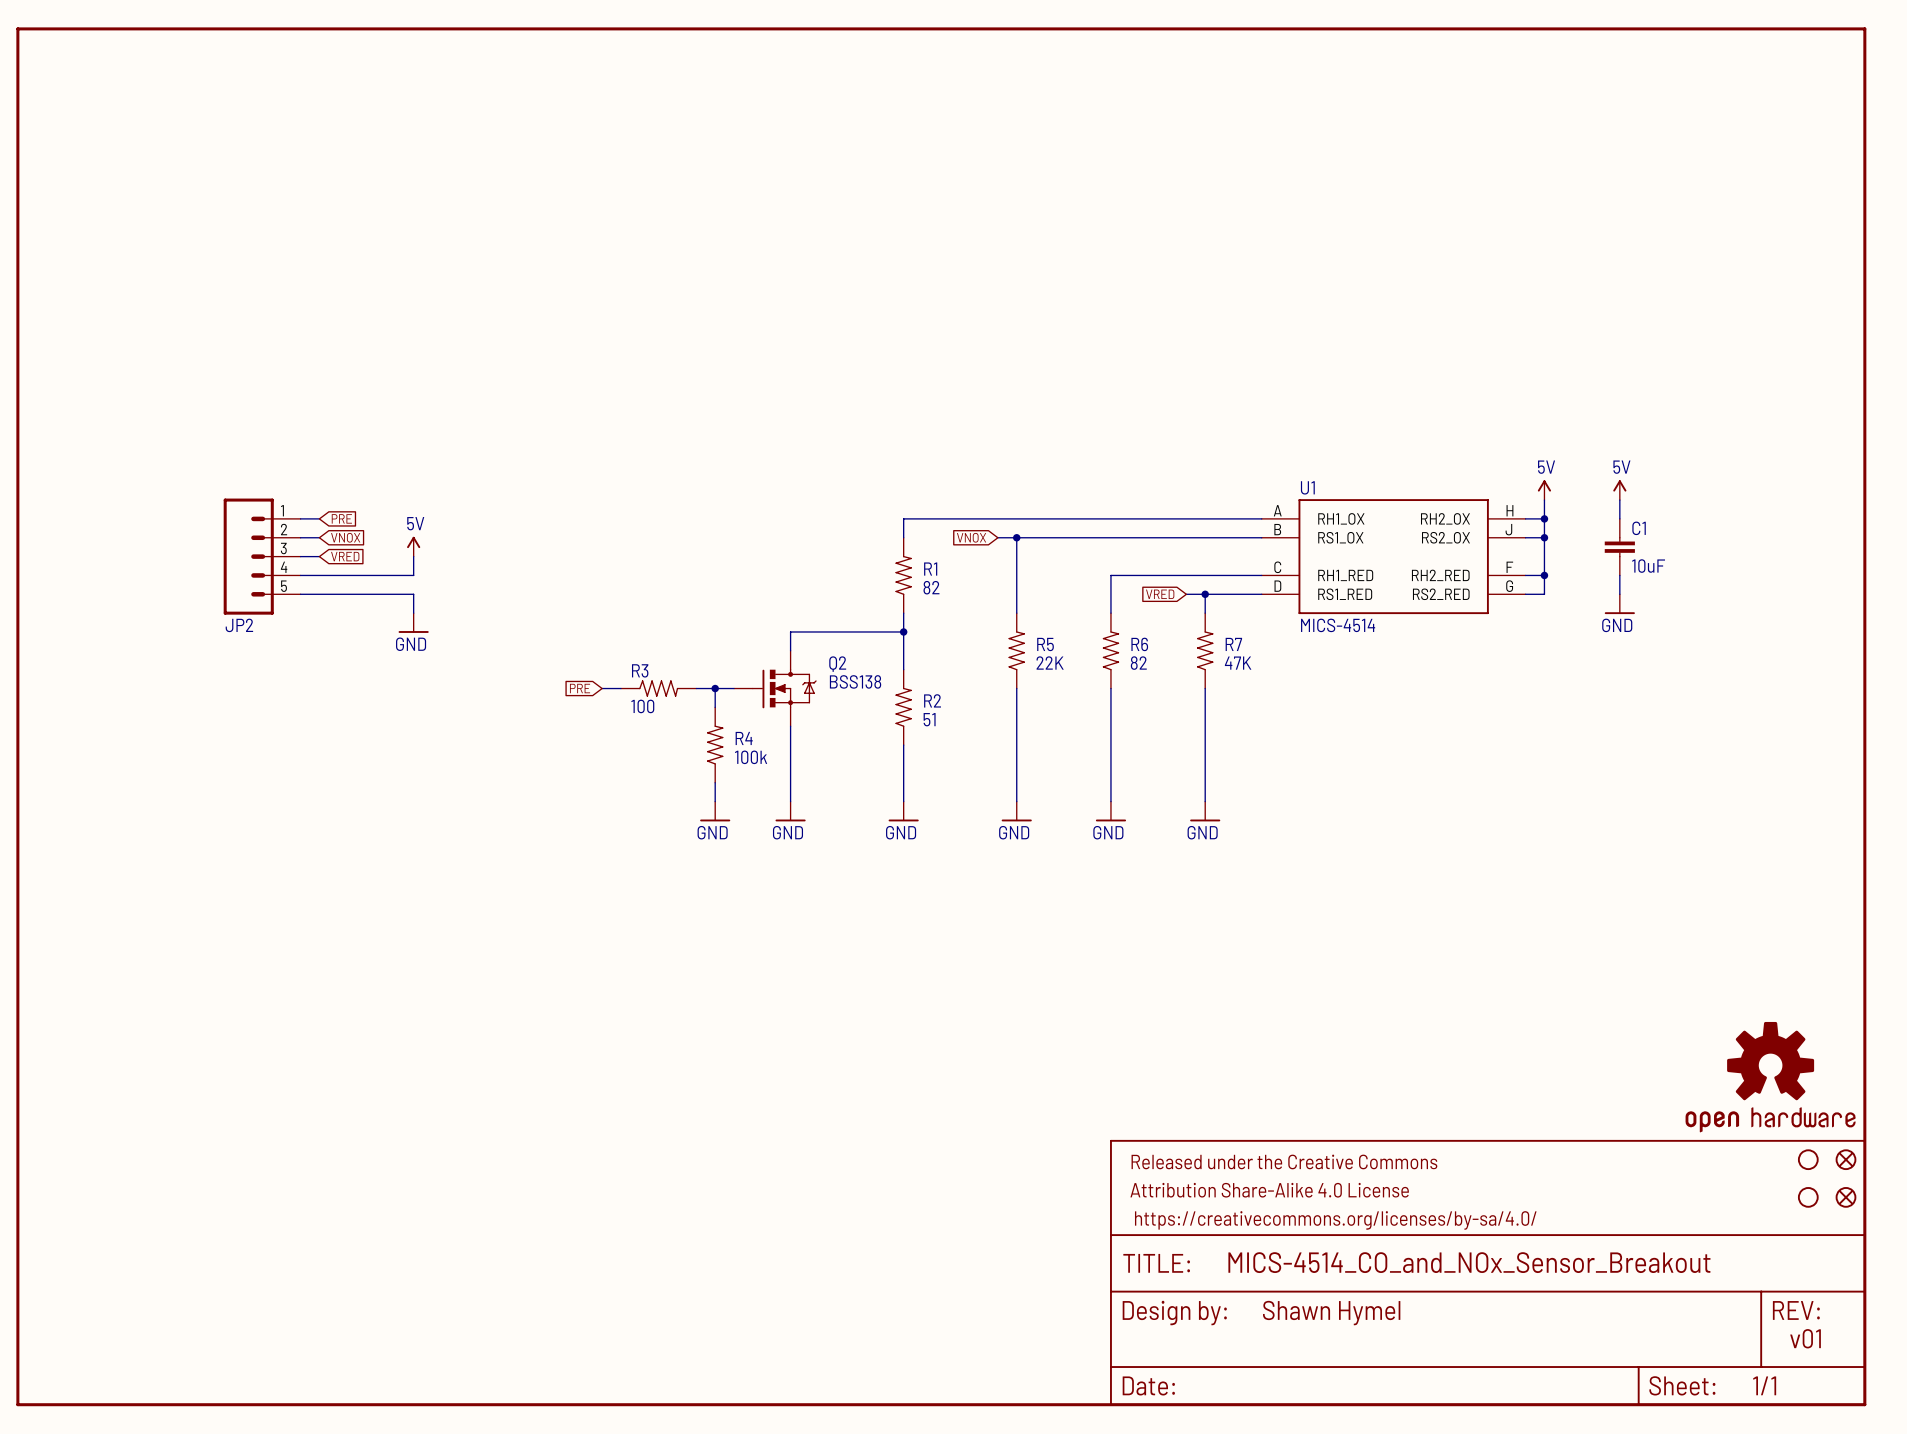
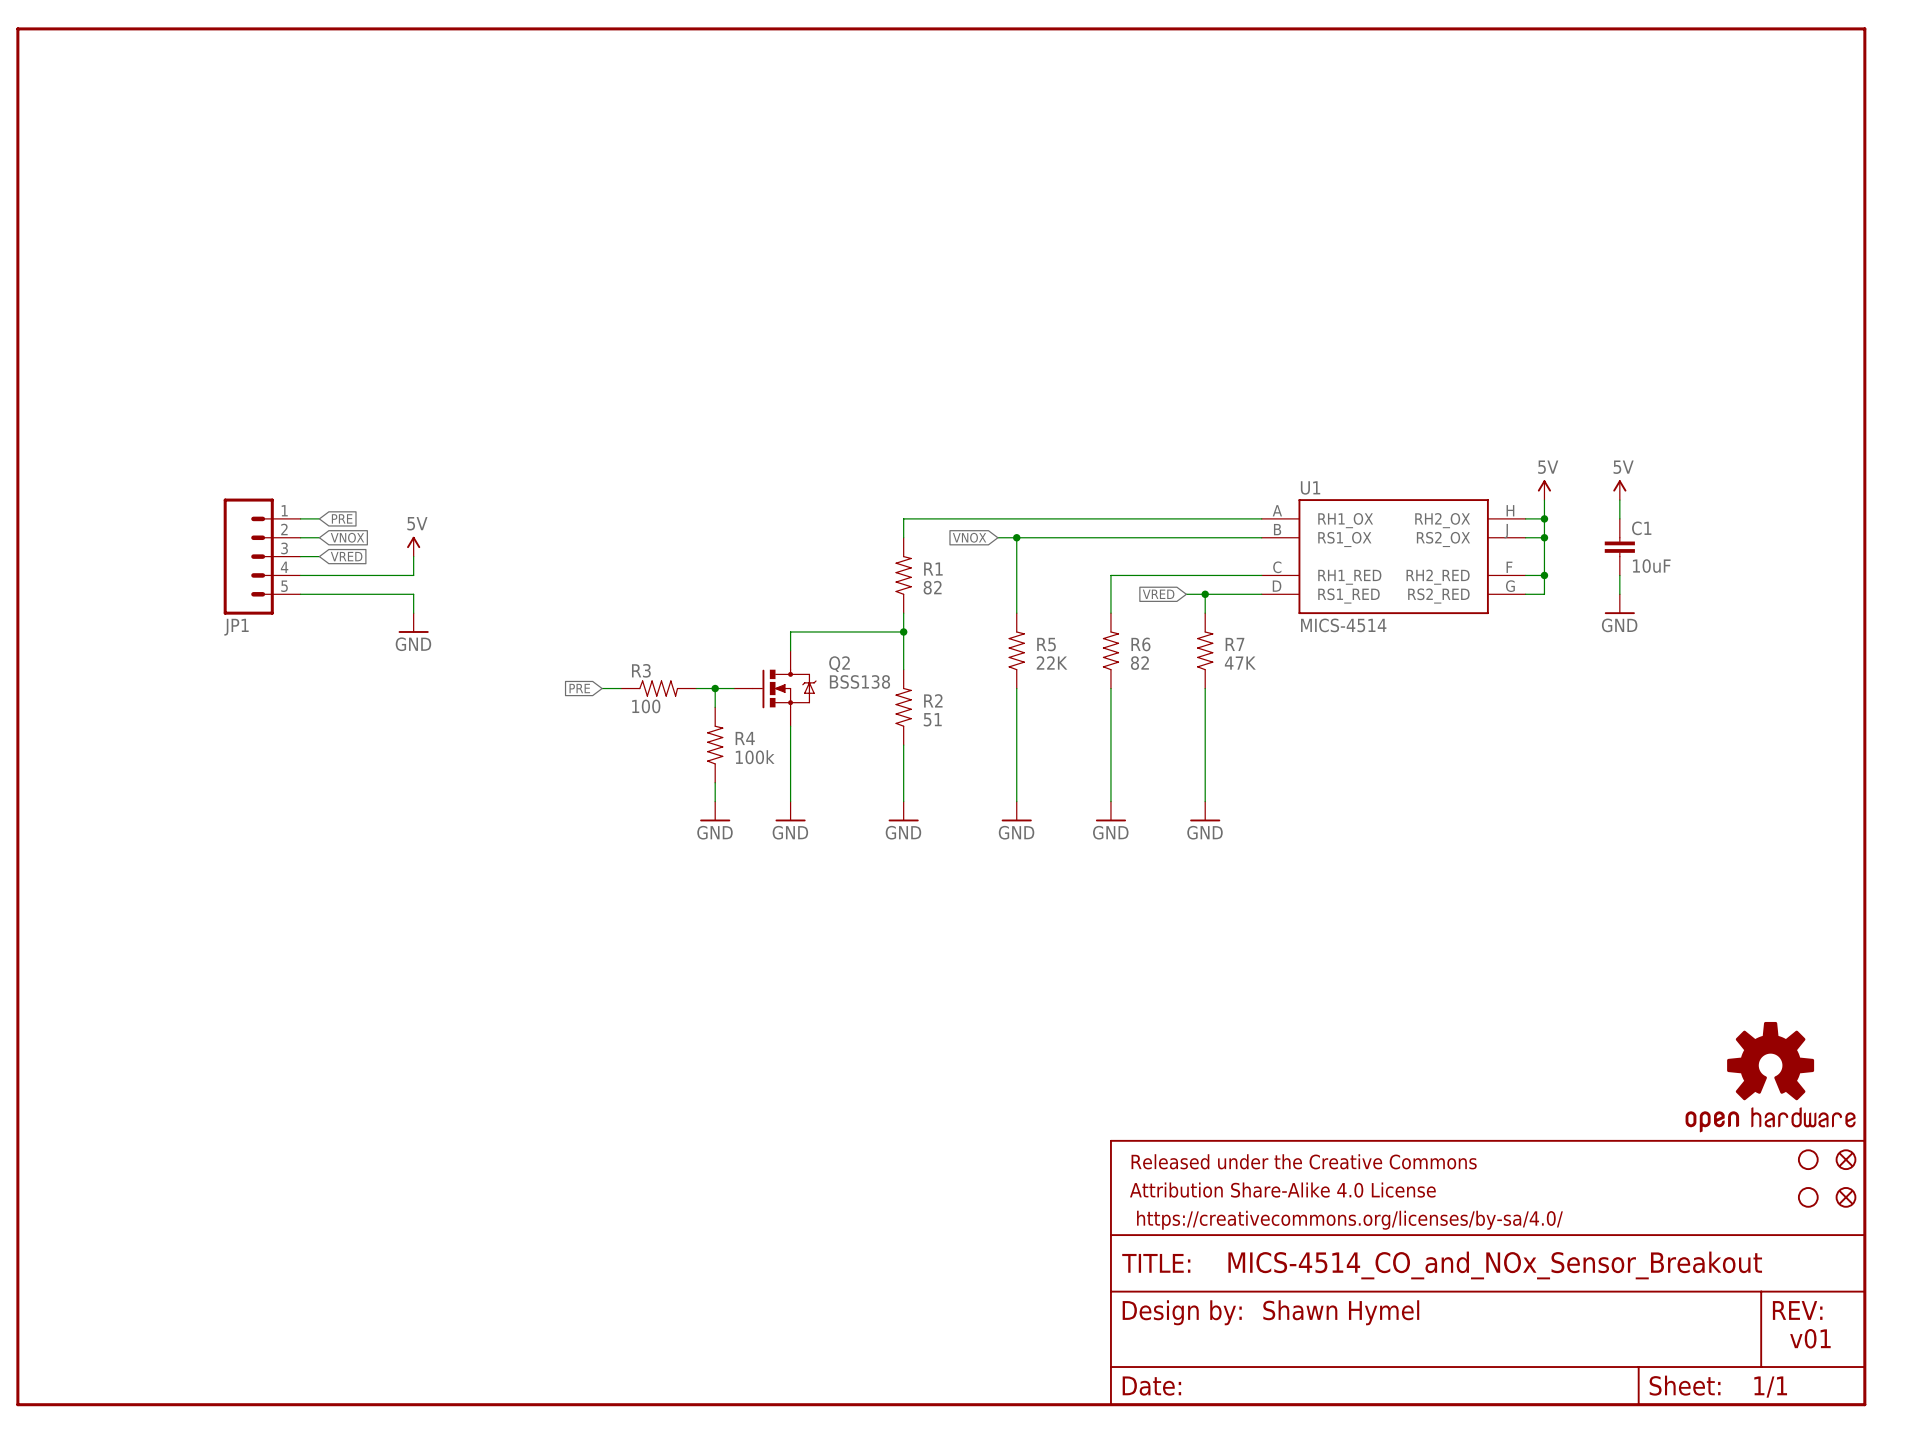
JP2 name: JP2 (239, 625) -> JP1 (236, 627)

